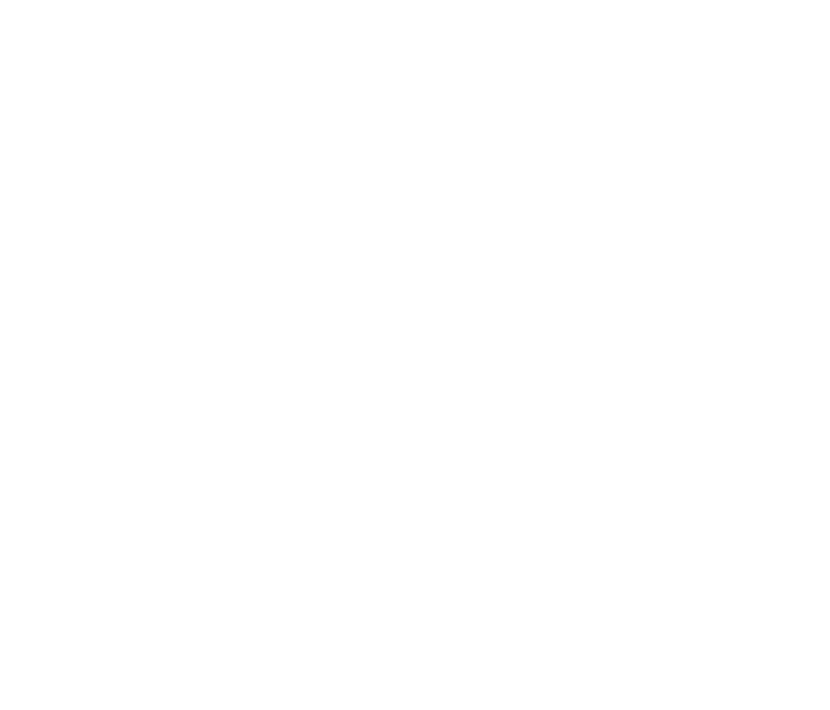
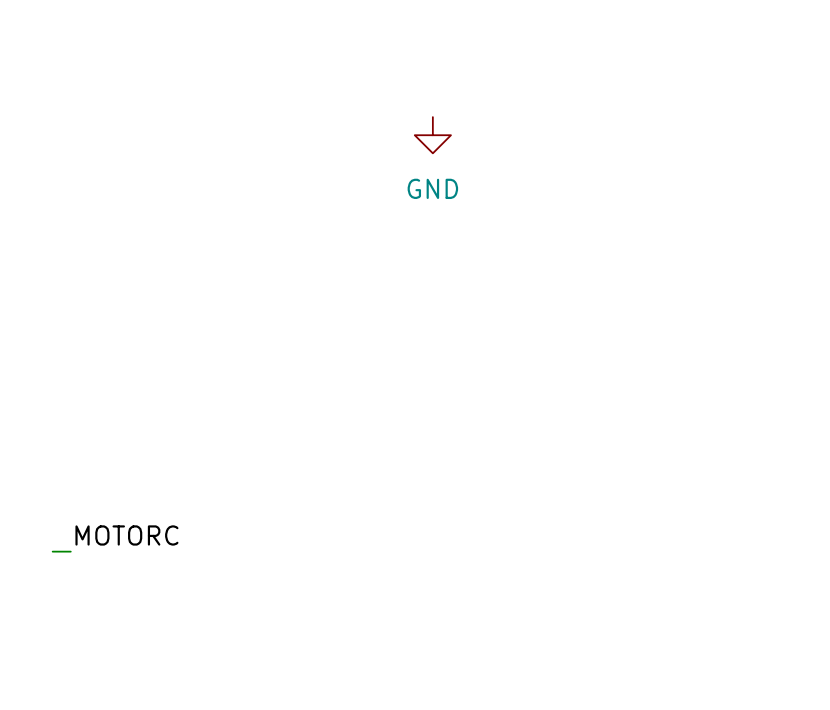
power symbol: none -> GND (432, 135)
label: none -> MOTORC (126, 535)
wire: none -> (52, 551) (70, 551)

